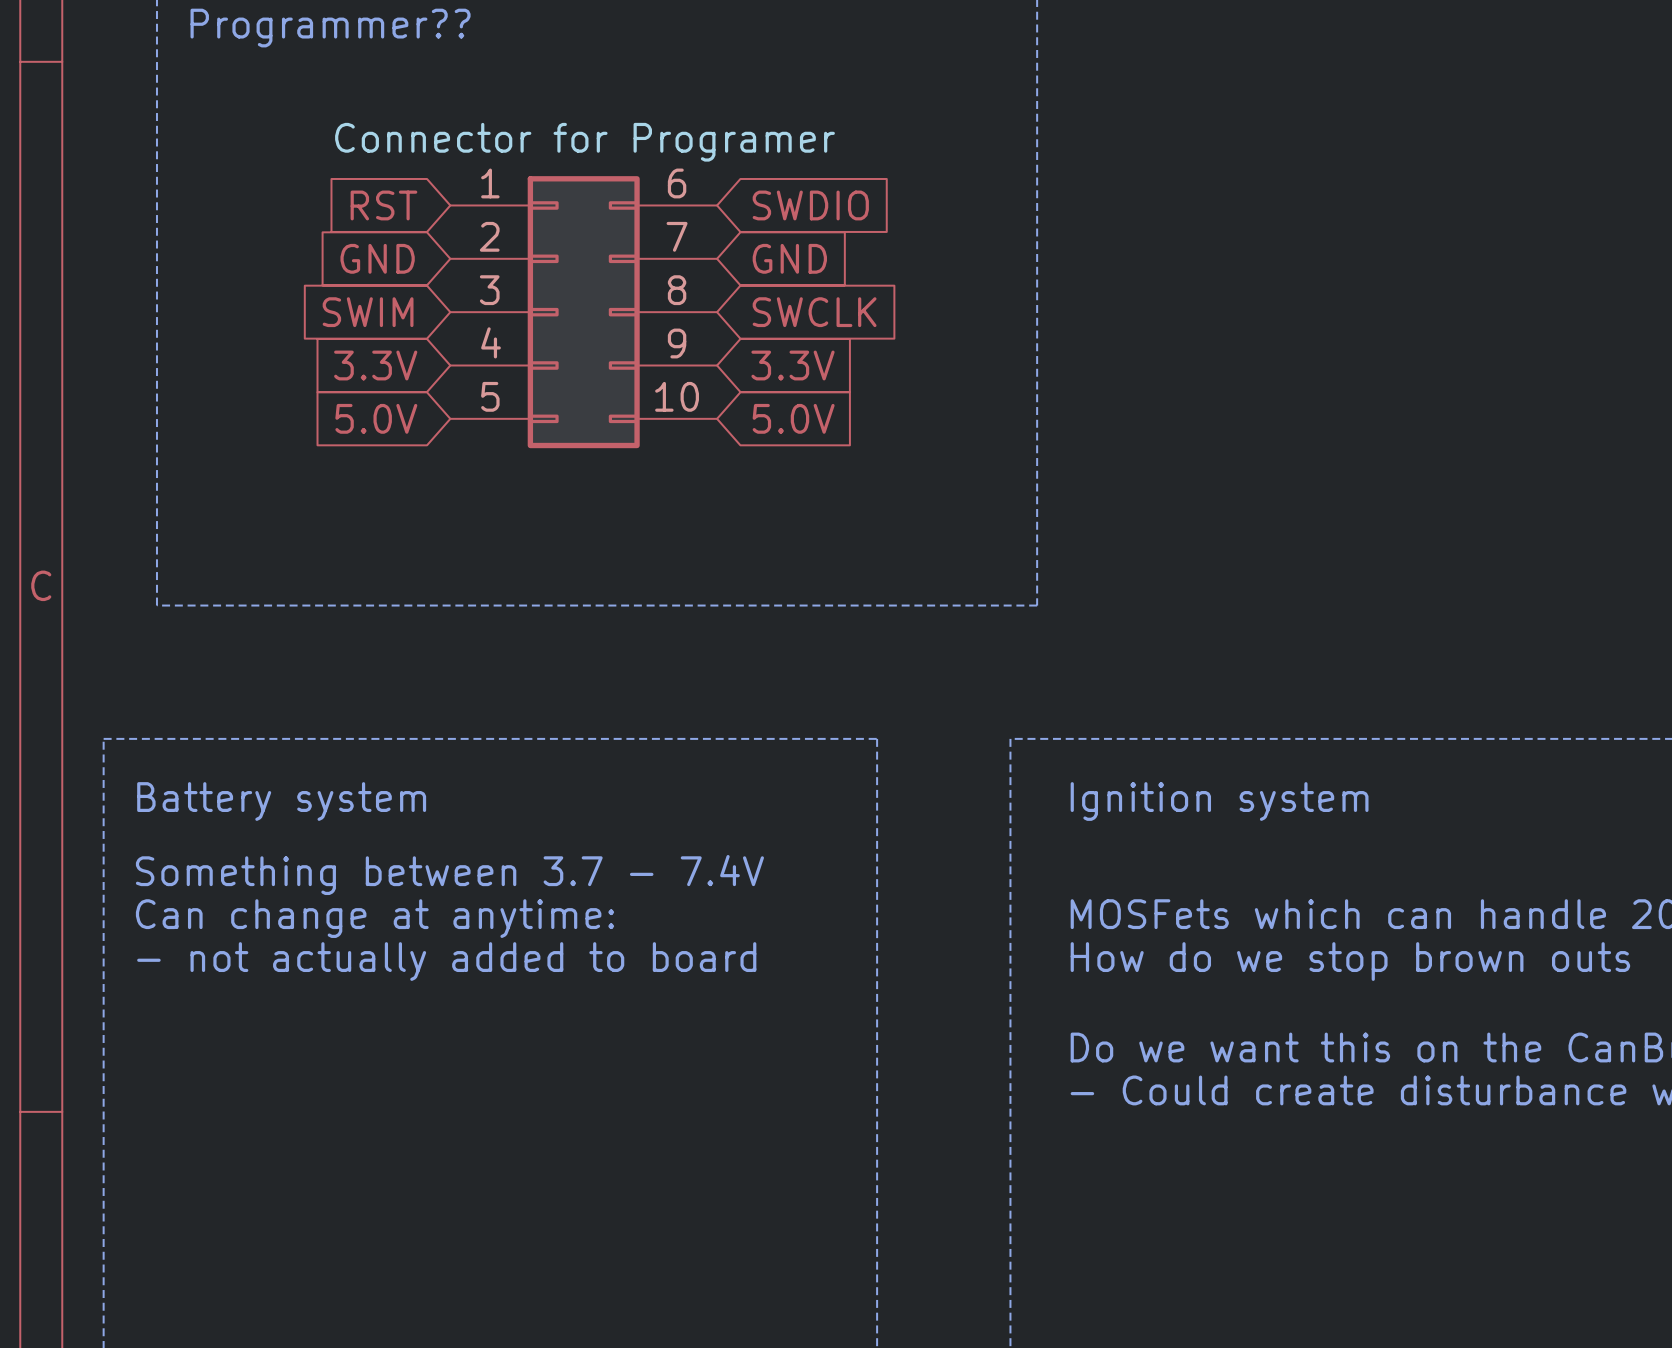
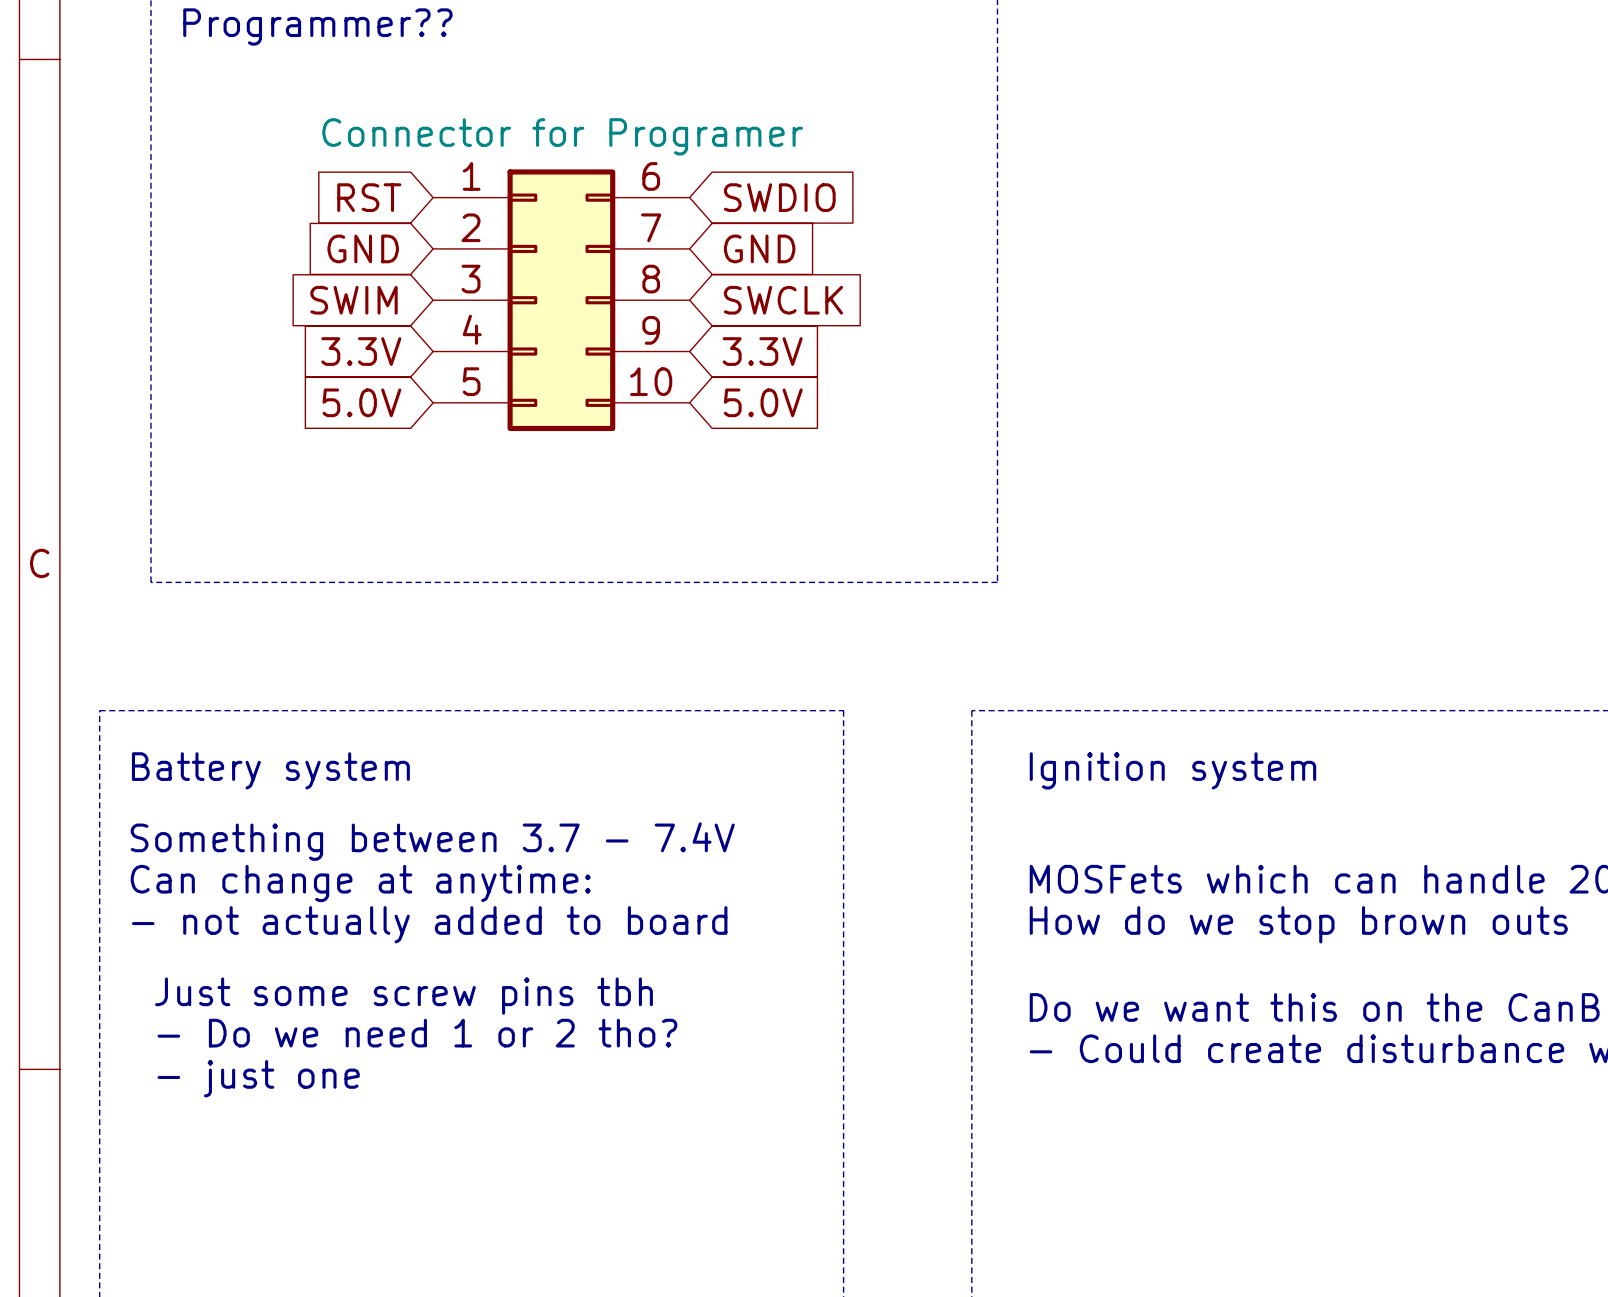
text: none -> Just some screw pins tbh (404, 996)
text: none -> - Do we need 1 or 2 tho? (417, 1033)
text: none -> - just one (258, 1078)

